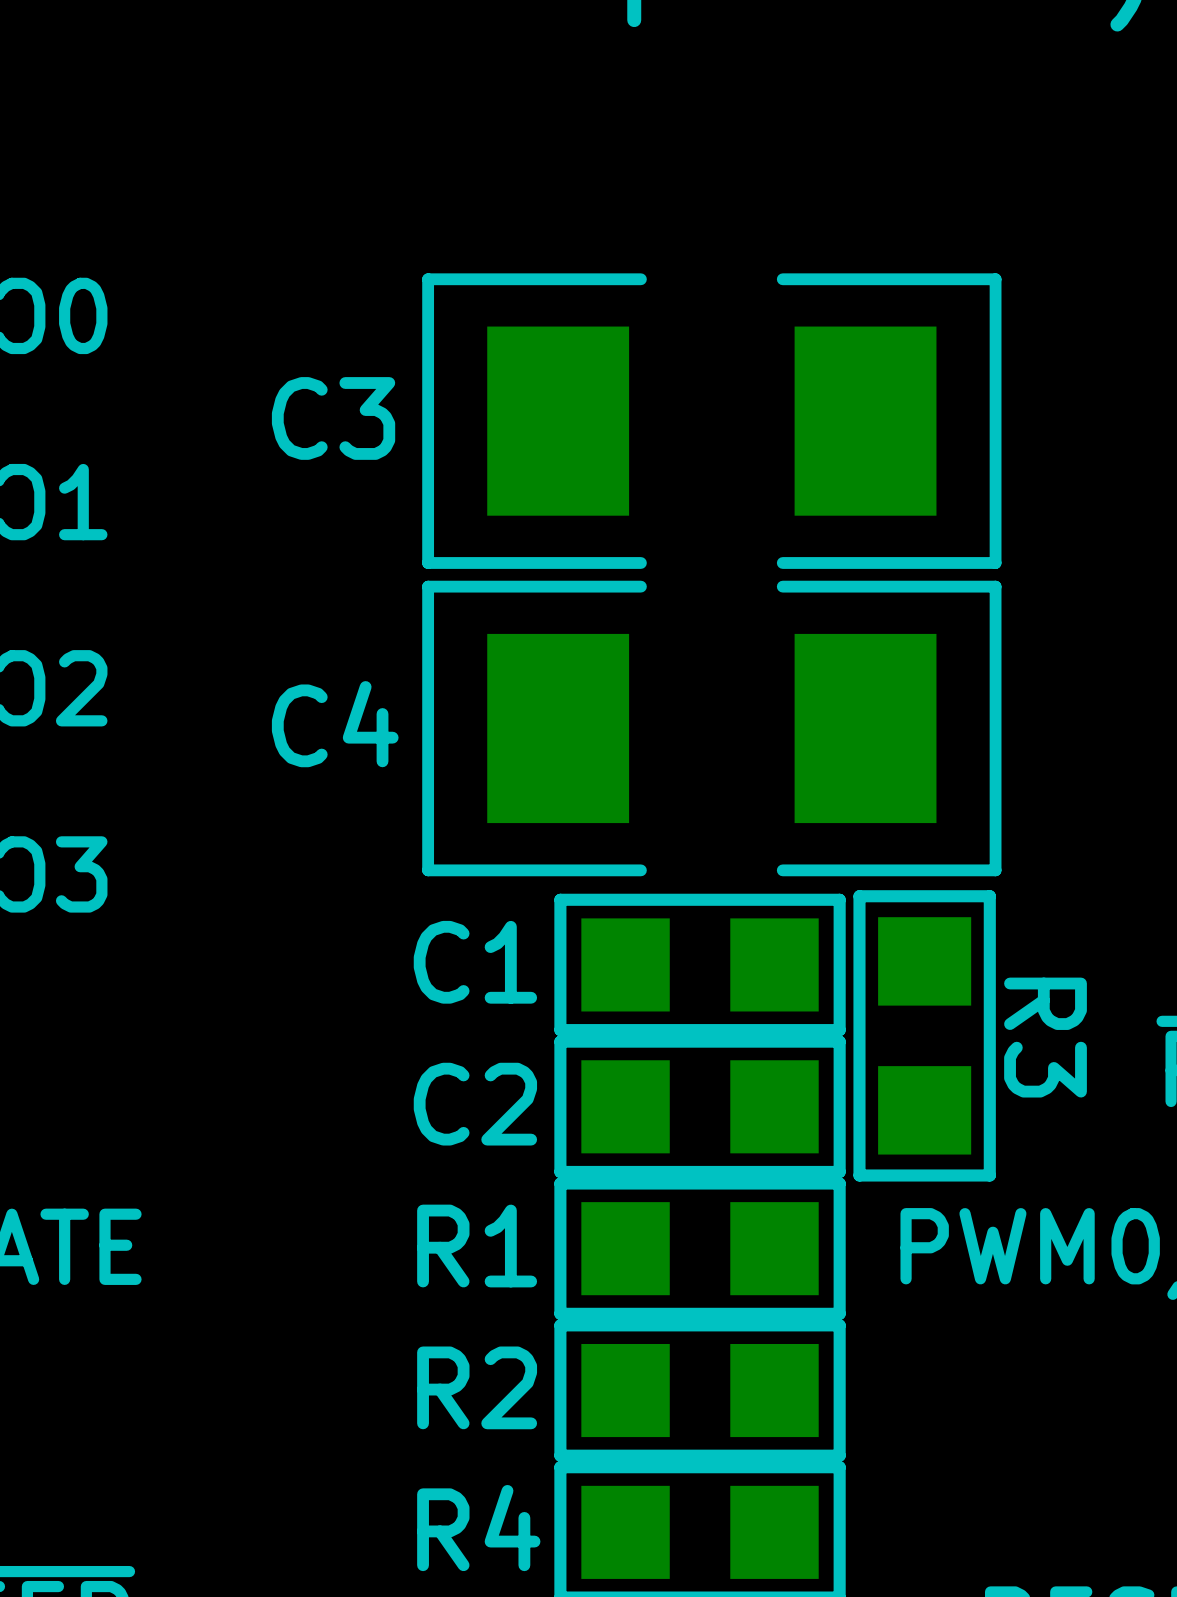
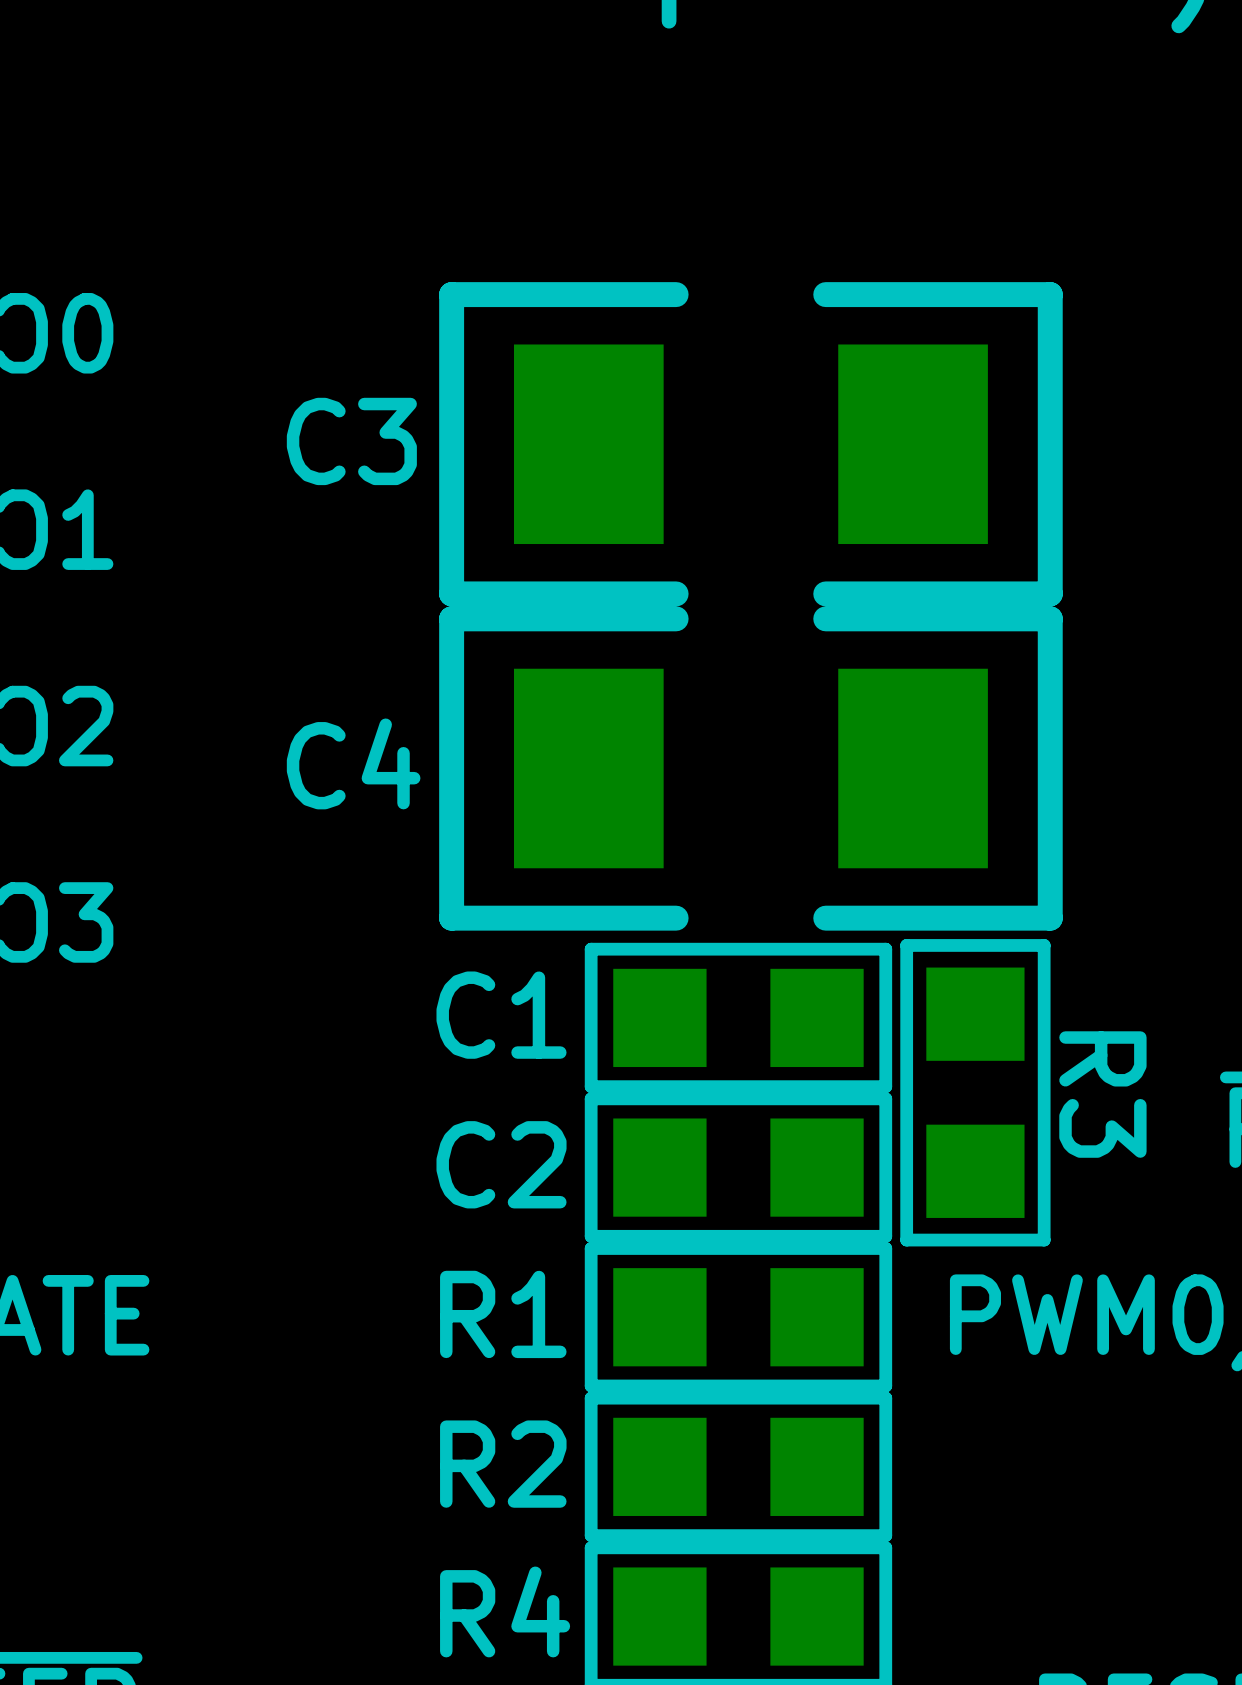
C3 footprint: [422, 273, 1002, 569] -> [439, 282, 1063, 607]
C4 footprint: [422, 580, 1002, 877] -> [439, 606, 1063, 931]

